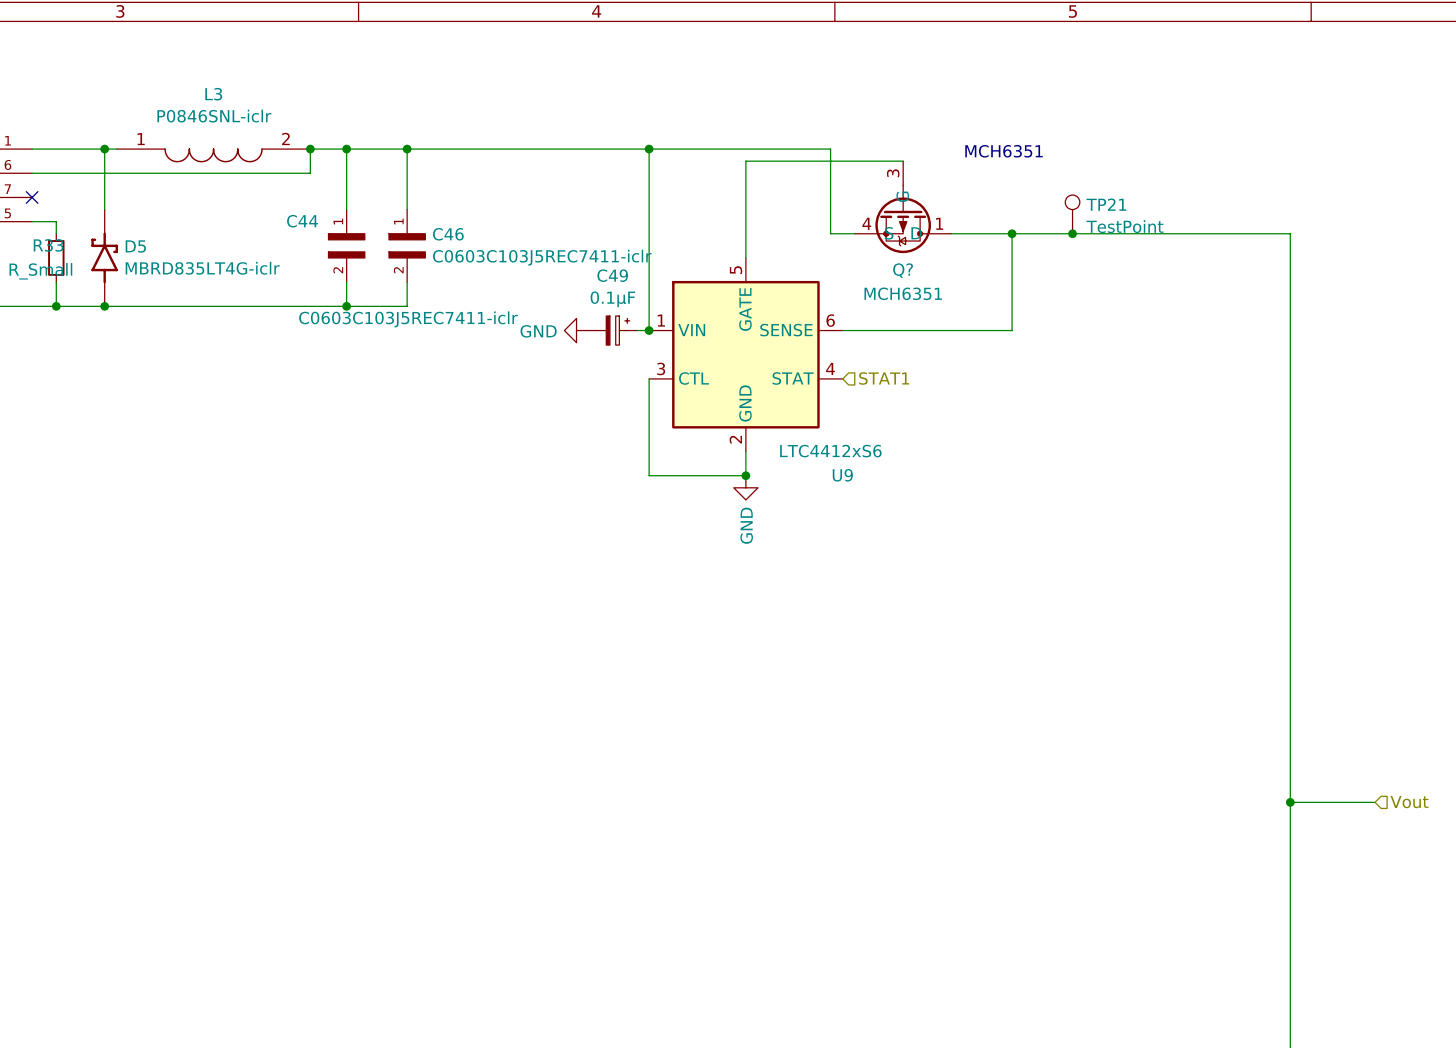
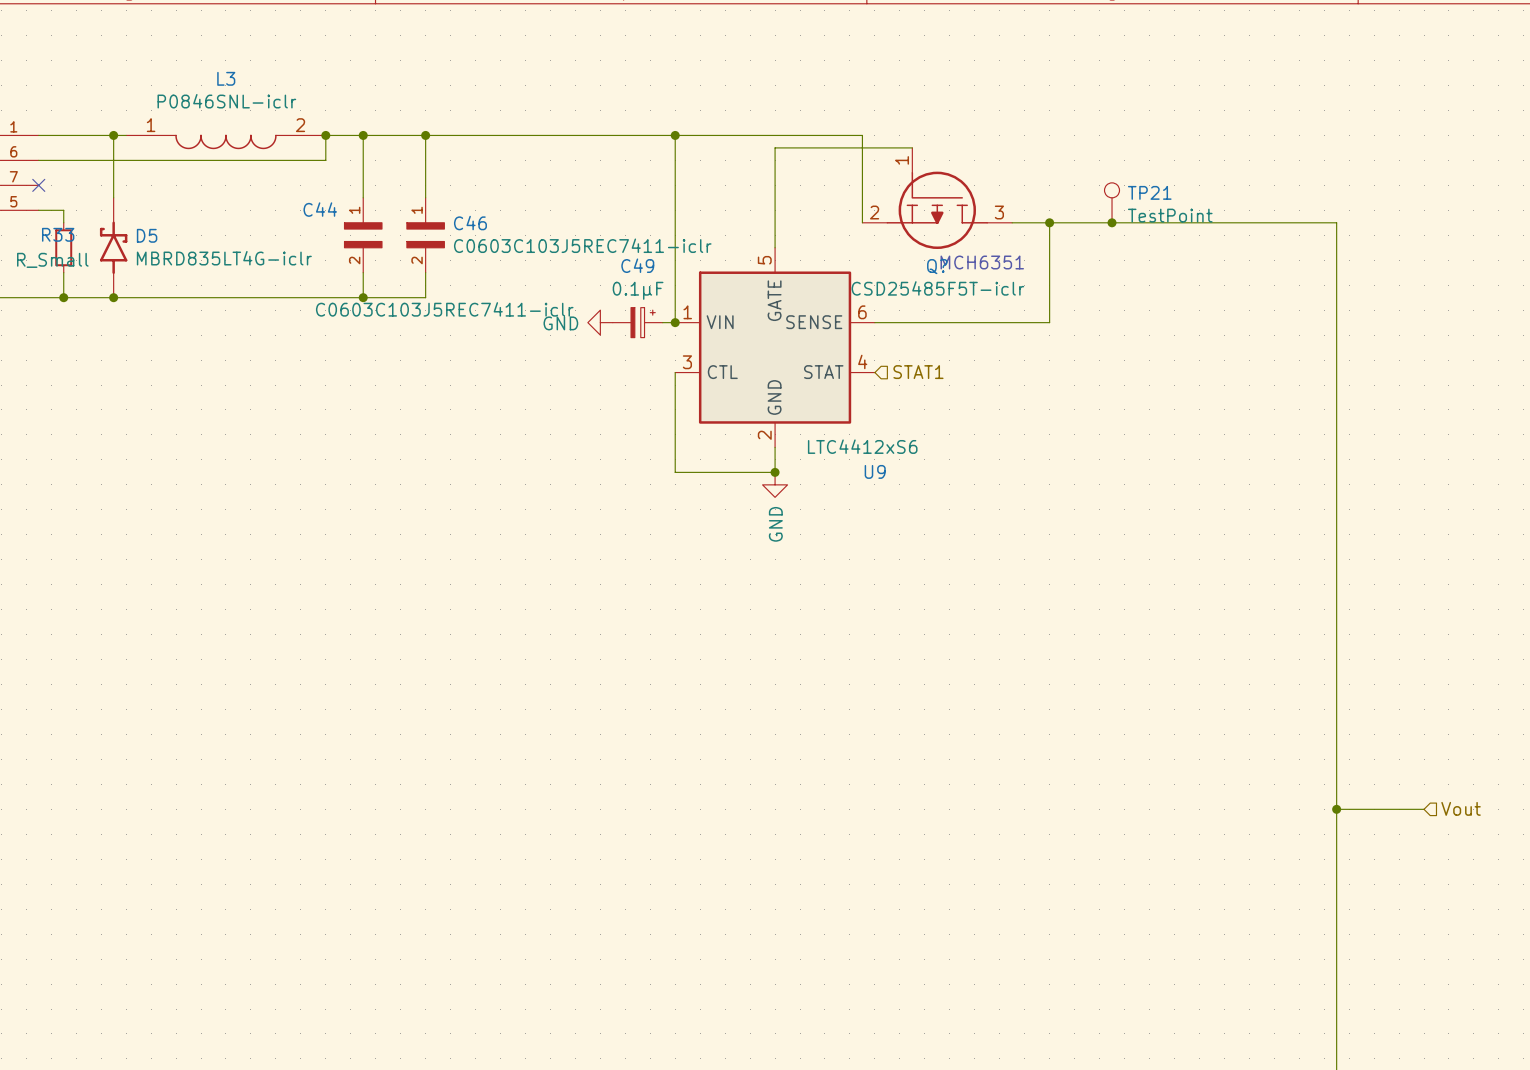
text position: MCH6351 (1004, 151) -> MCH6351 (982, 262)
Q? symbol: [854, 161, 952, 254] -> [862, 147, 1013, 250]
wire: (878, 161) (903, 161) -> none
Q? value: MCH6351 (903, 293) -> CSD25485F5T-iclr (937, 288)

